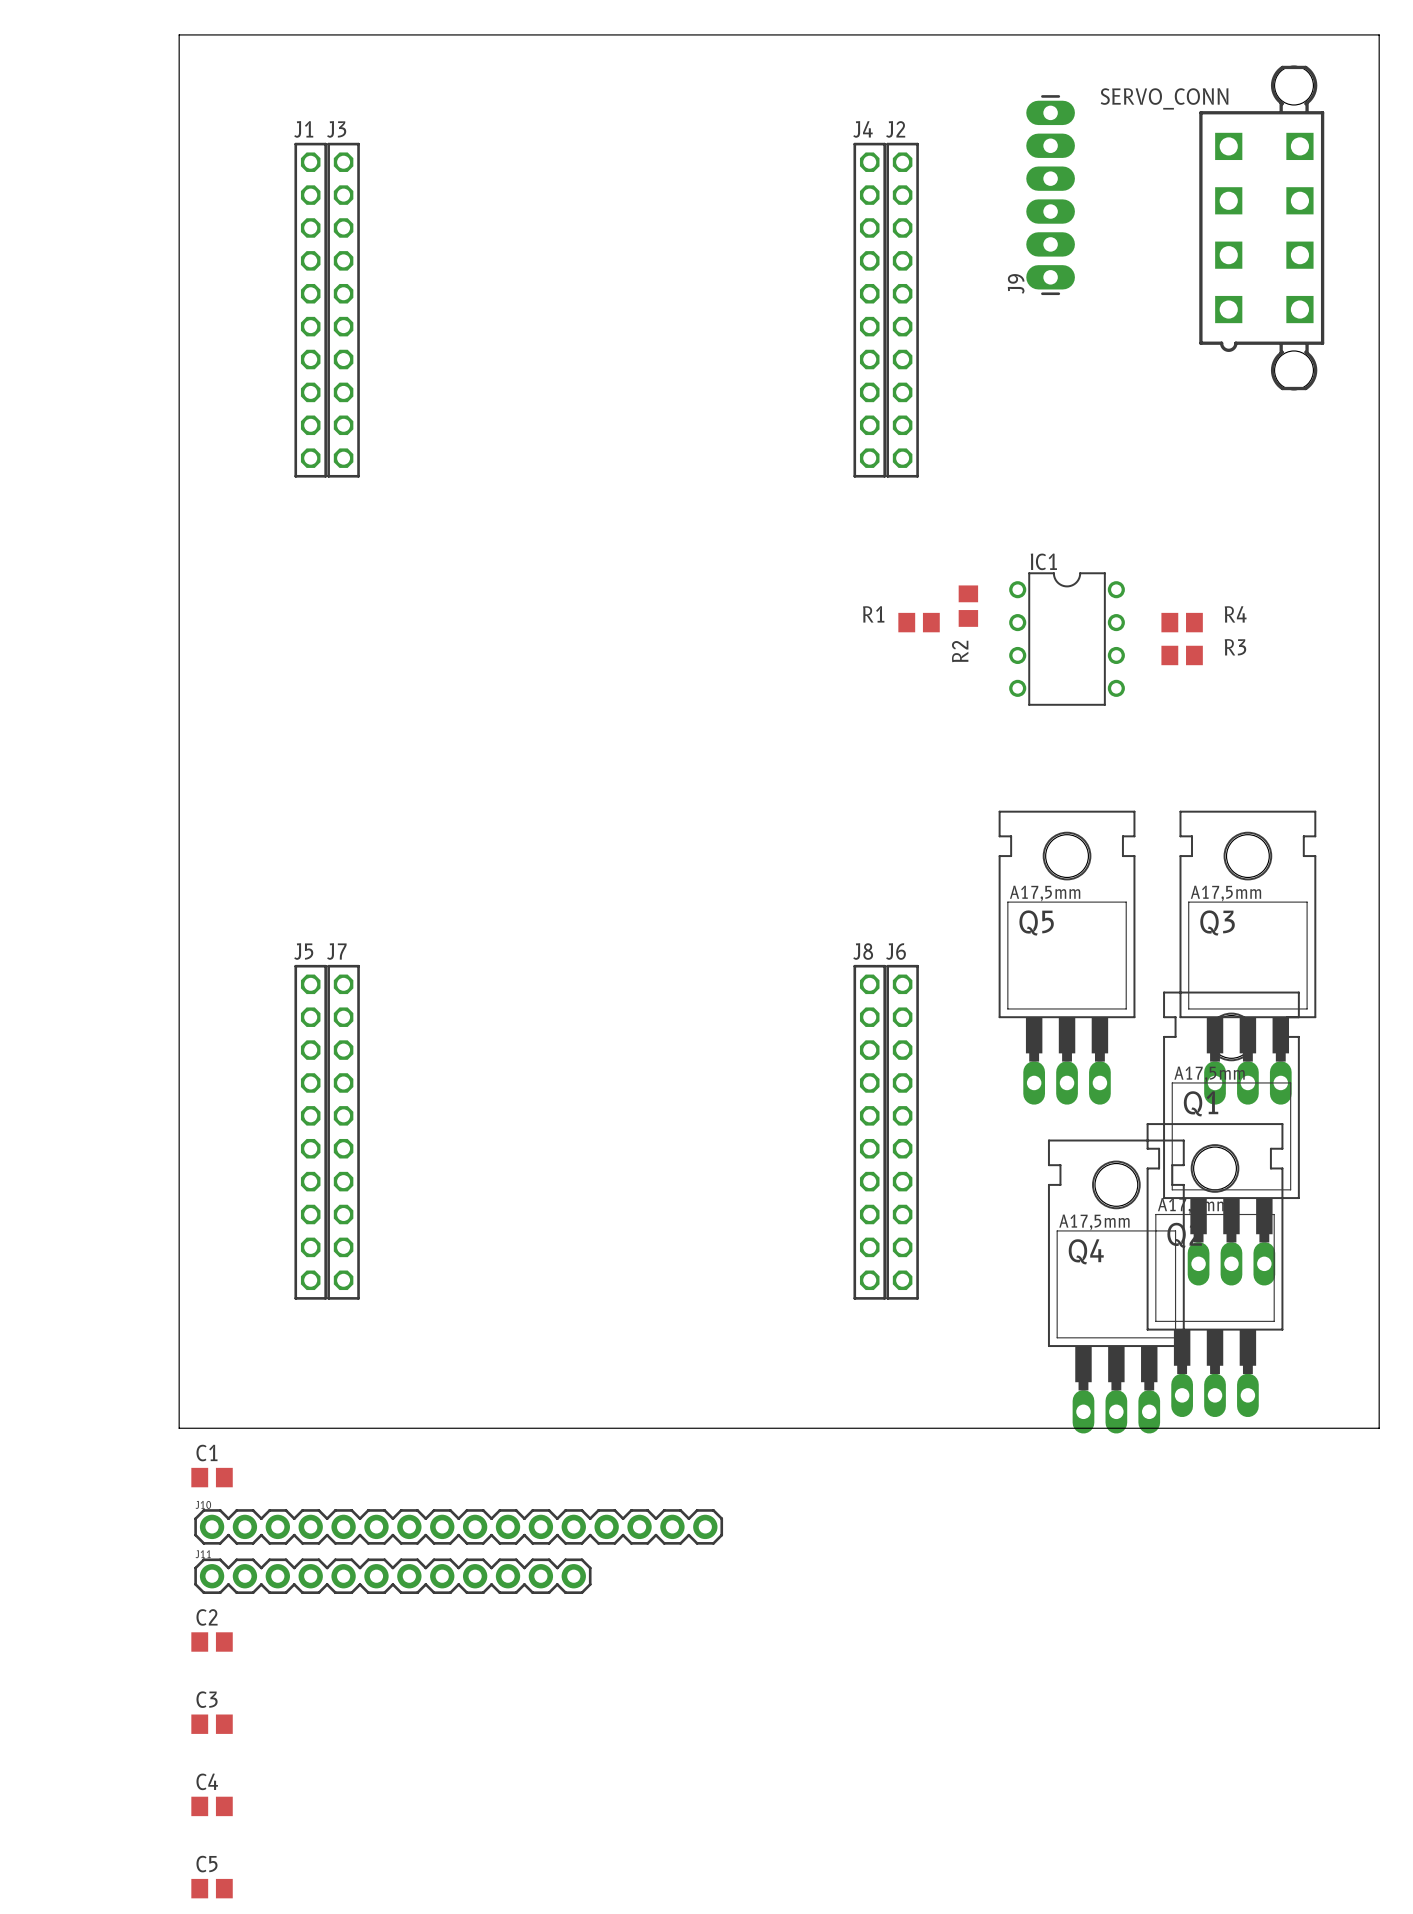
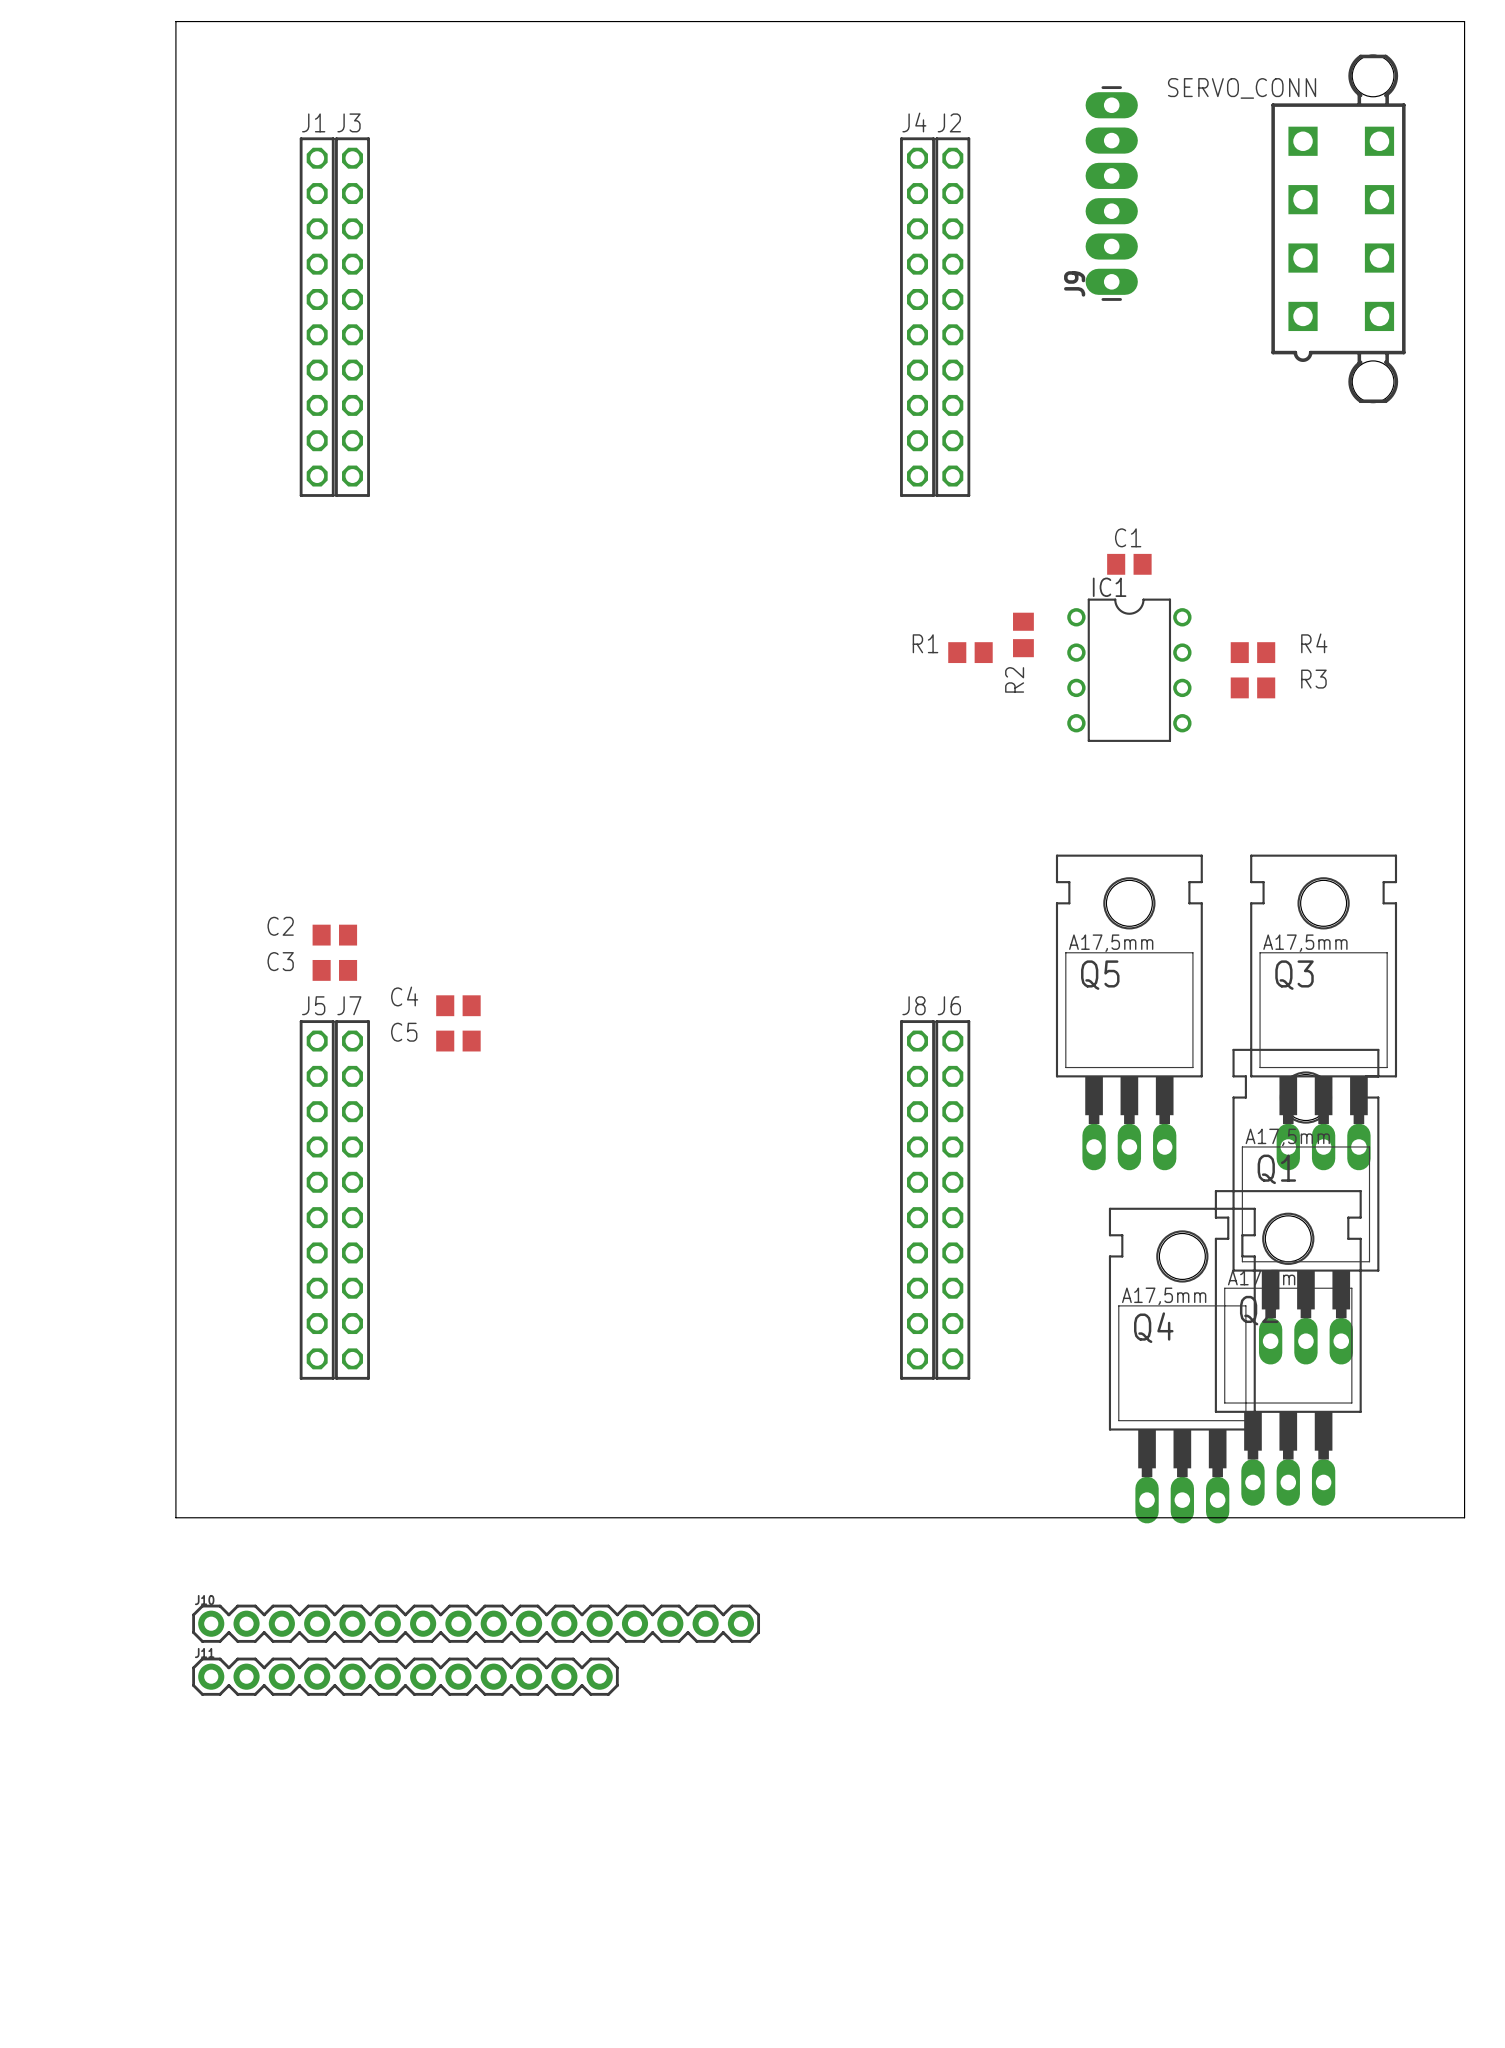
C1 position: (212, 1477) -> (1129, 564)
C2 name position: C2 (207, 1617) -> C2 (280, 926)
C2 position: (212, 1642) -> (334, 935)
C3 name position: C3 (207, 1699) -> C3 (280, 961)
C3 position: (212, 1724) -> (334, 970)
C4 name position: C4 (207, 1781) -> C4 (404, 996)
C4 position: (212, 1806) -> (458, 1005)
C5 name position: C5 (206, 1864) -> C5 (404, 1032)
C5 position: (212, 1888) -> (458, 1041)

